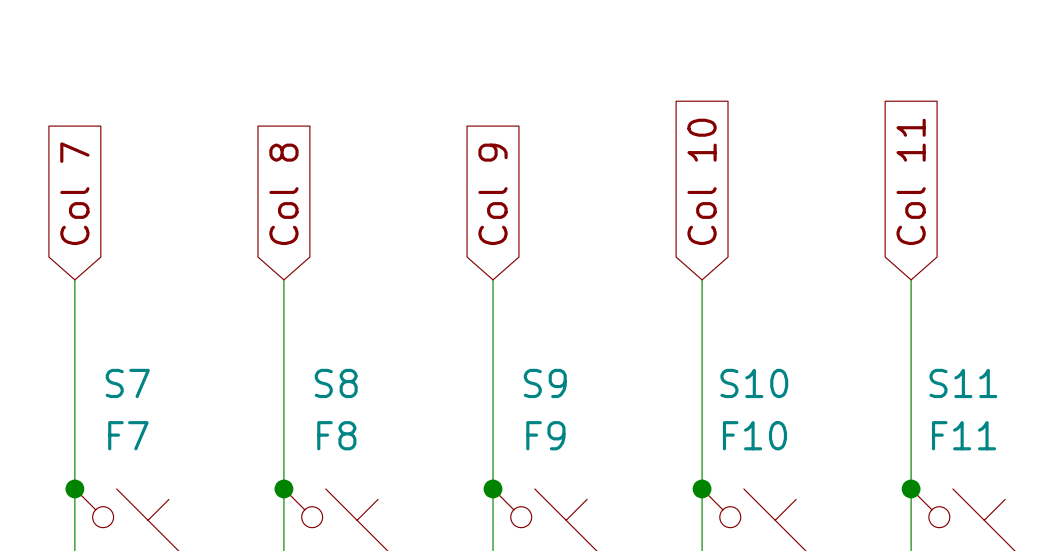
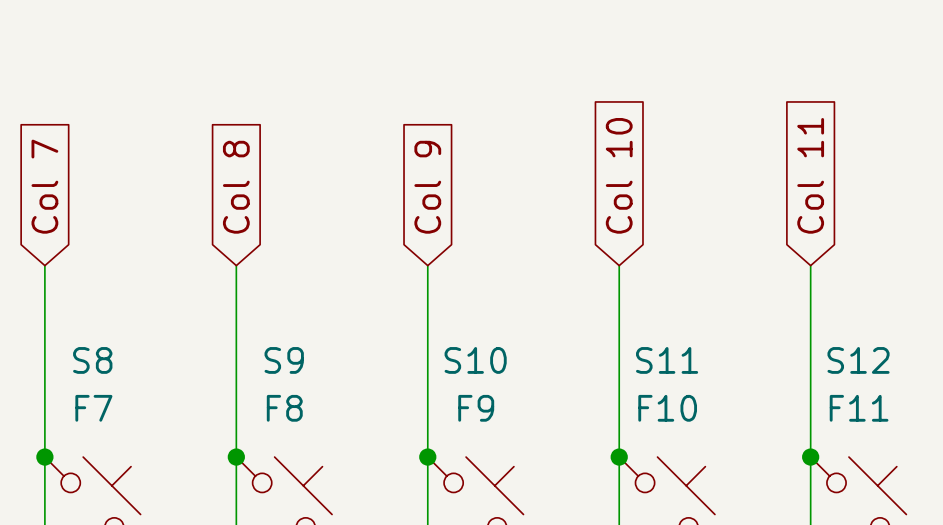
S7 name: S7 (127, 383) -> S8 (92, 360)
S8 name: S8 (336, 383) -> S9 (284, 360)
S9 name: S9 (545, 383) -> S10 (475, 360)
S10 name: S10 (754, 383) -> S11 (667, 360)
S11 name: S11 (963, 383) -> S12 (858, 360)

